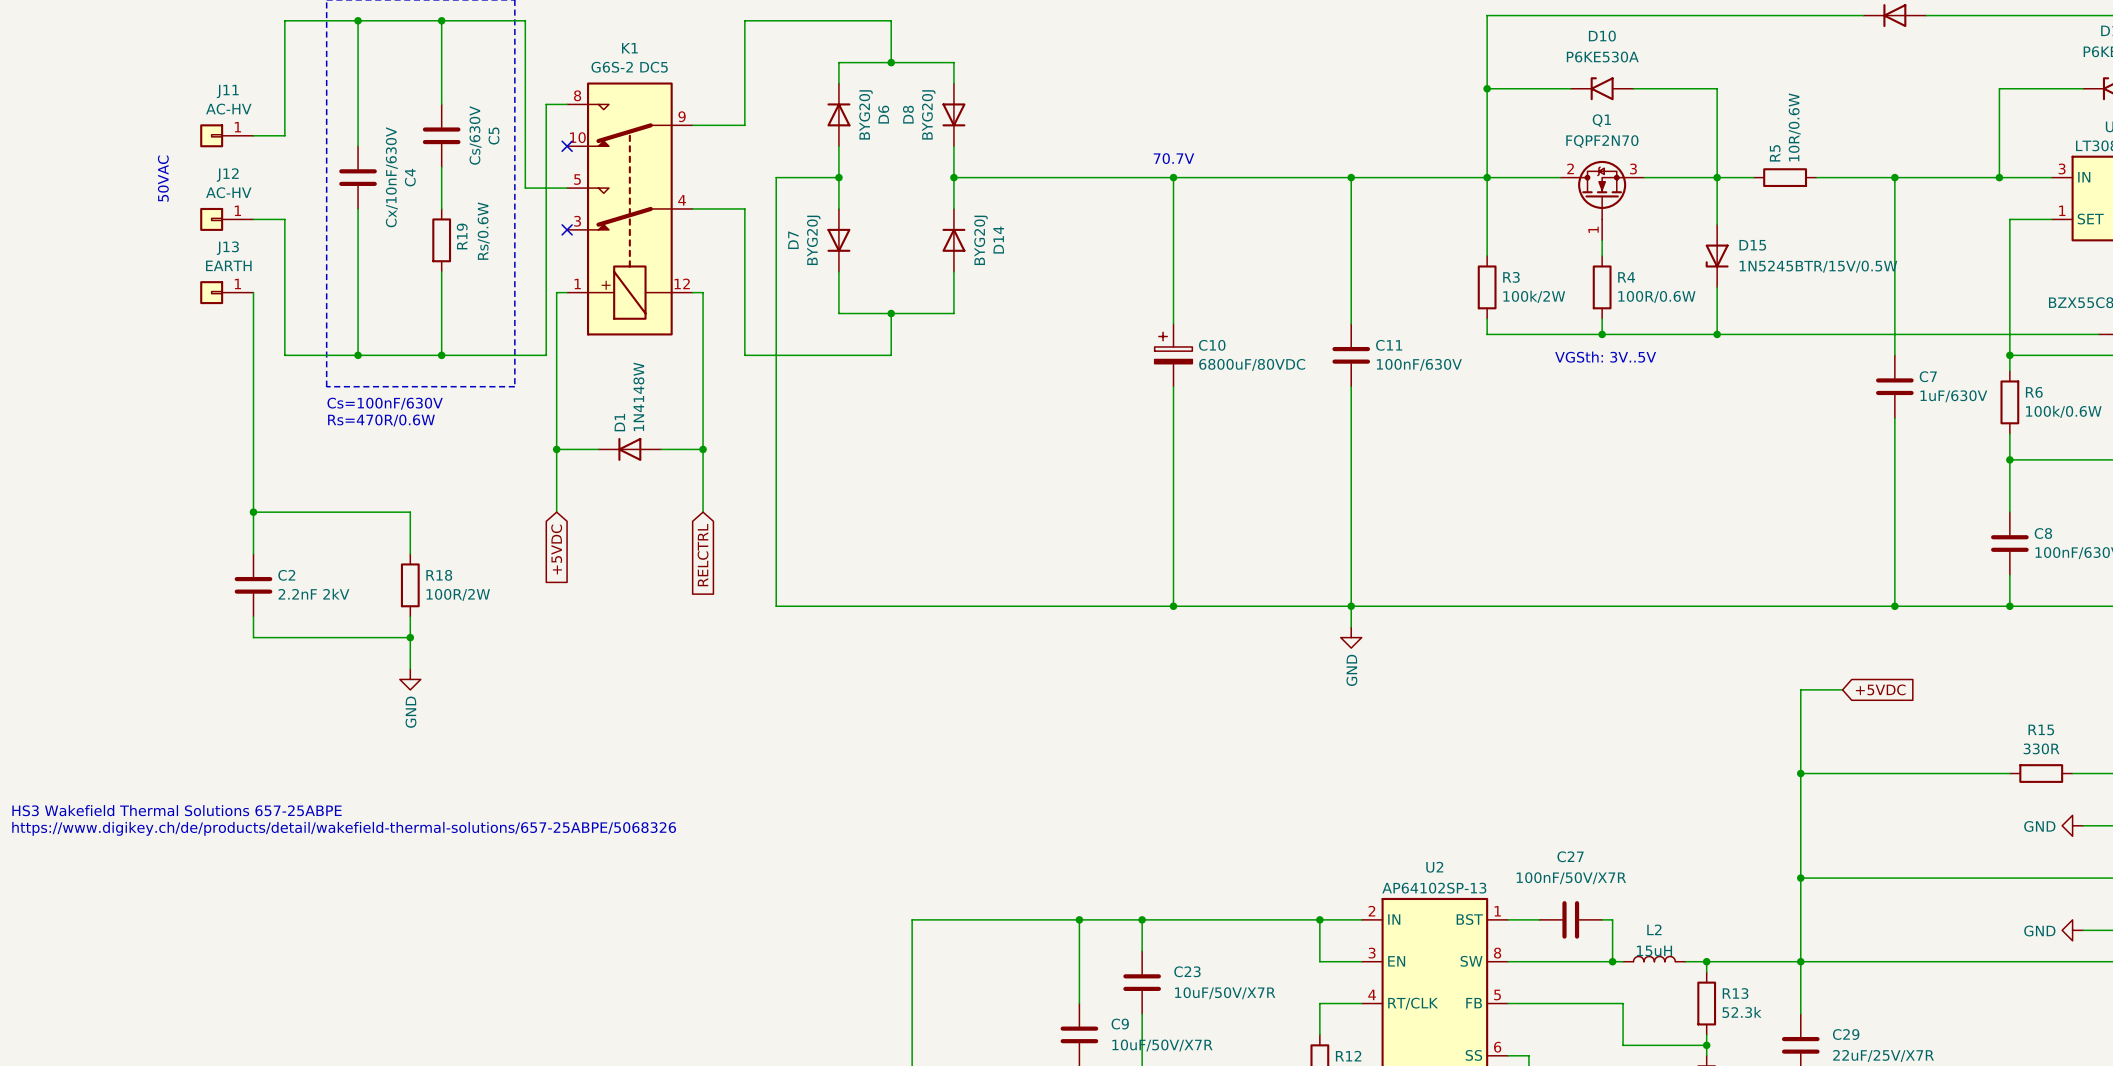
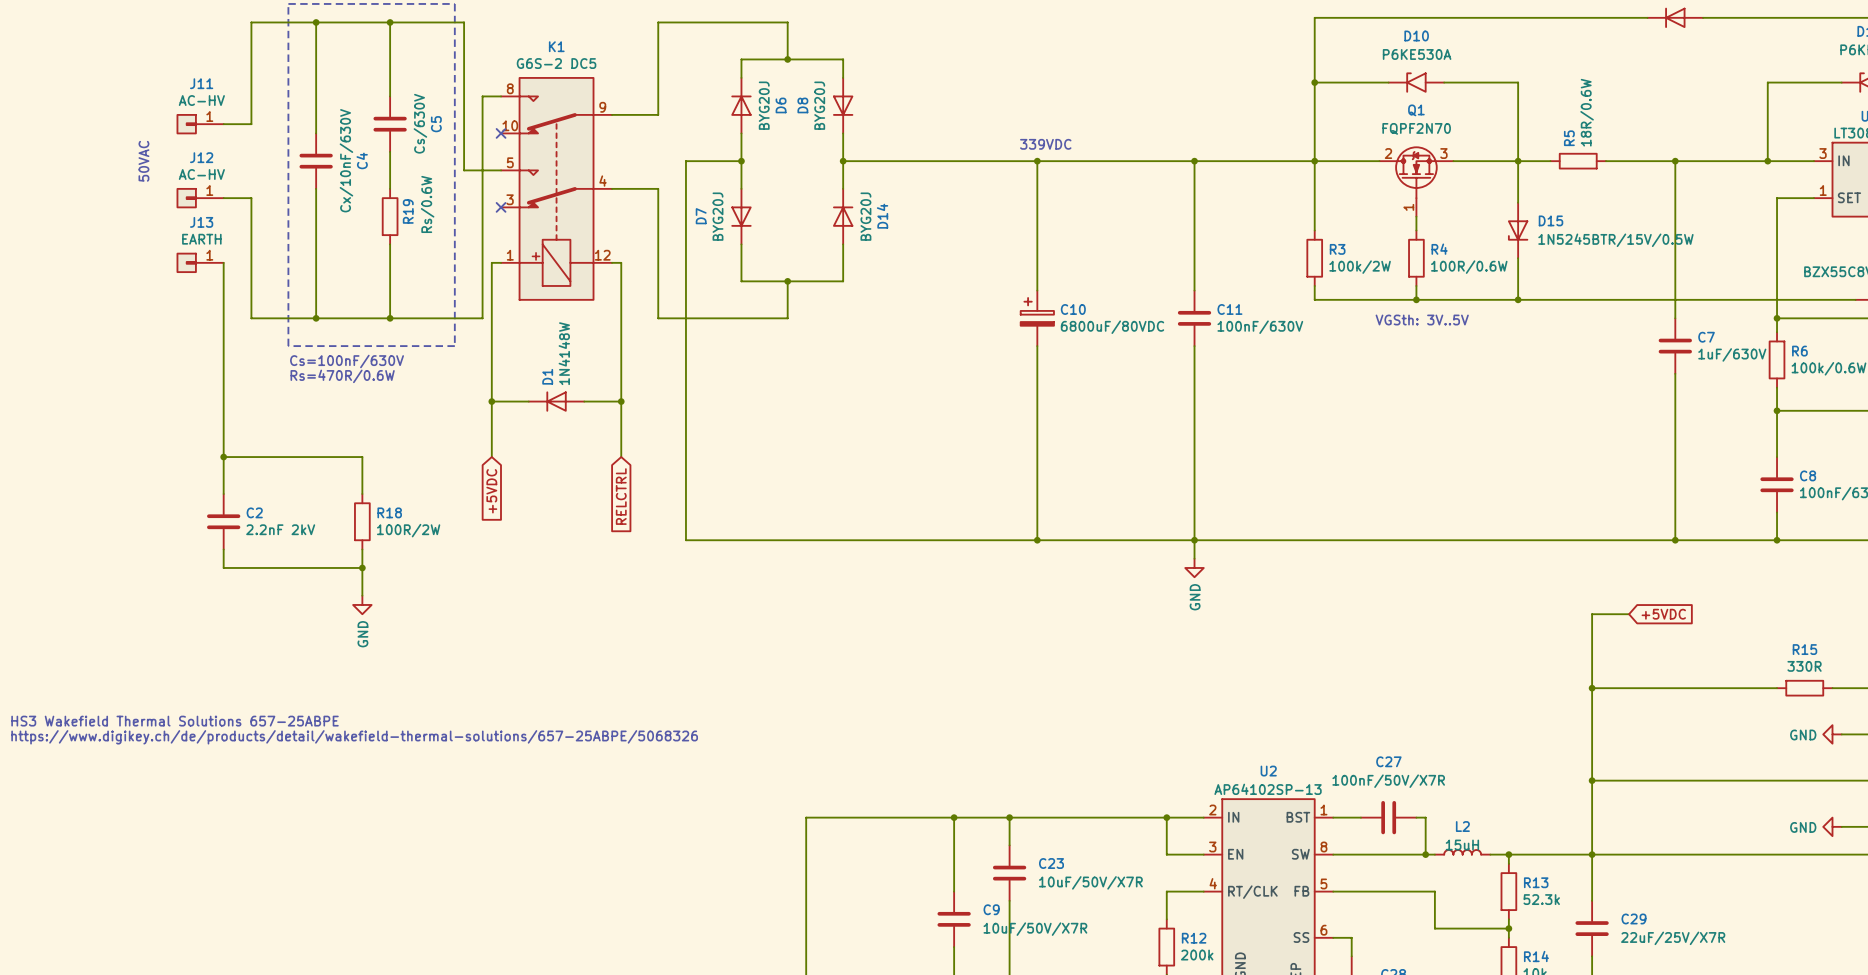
R5 value: 10R/0.6W (1794, 127) -> 18R/0.6W (1587, 112)
text: 70.7V (1173, 158) -> 339VDC (1045, 144)

